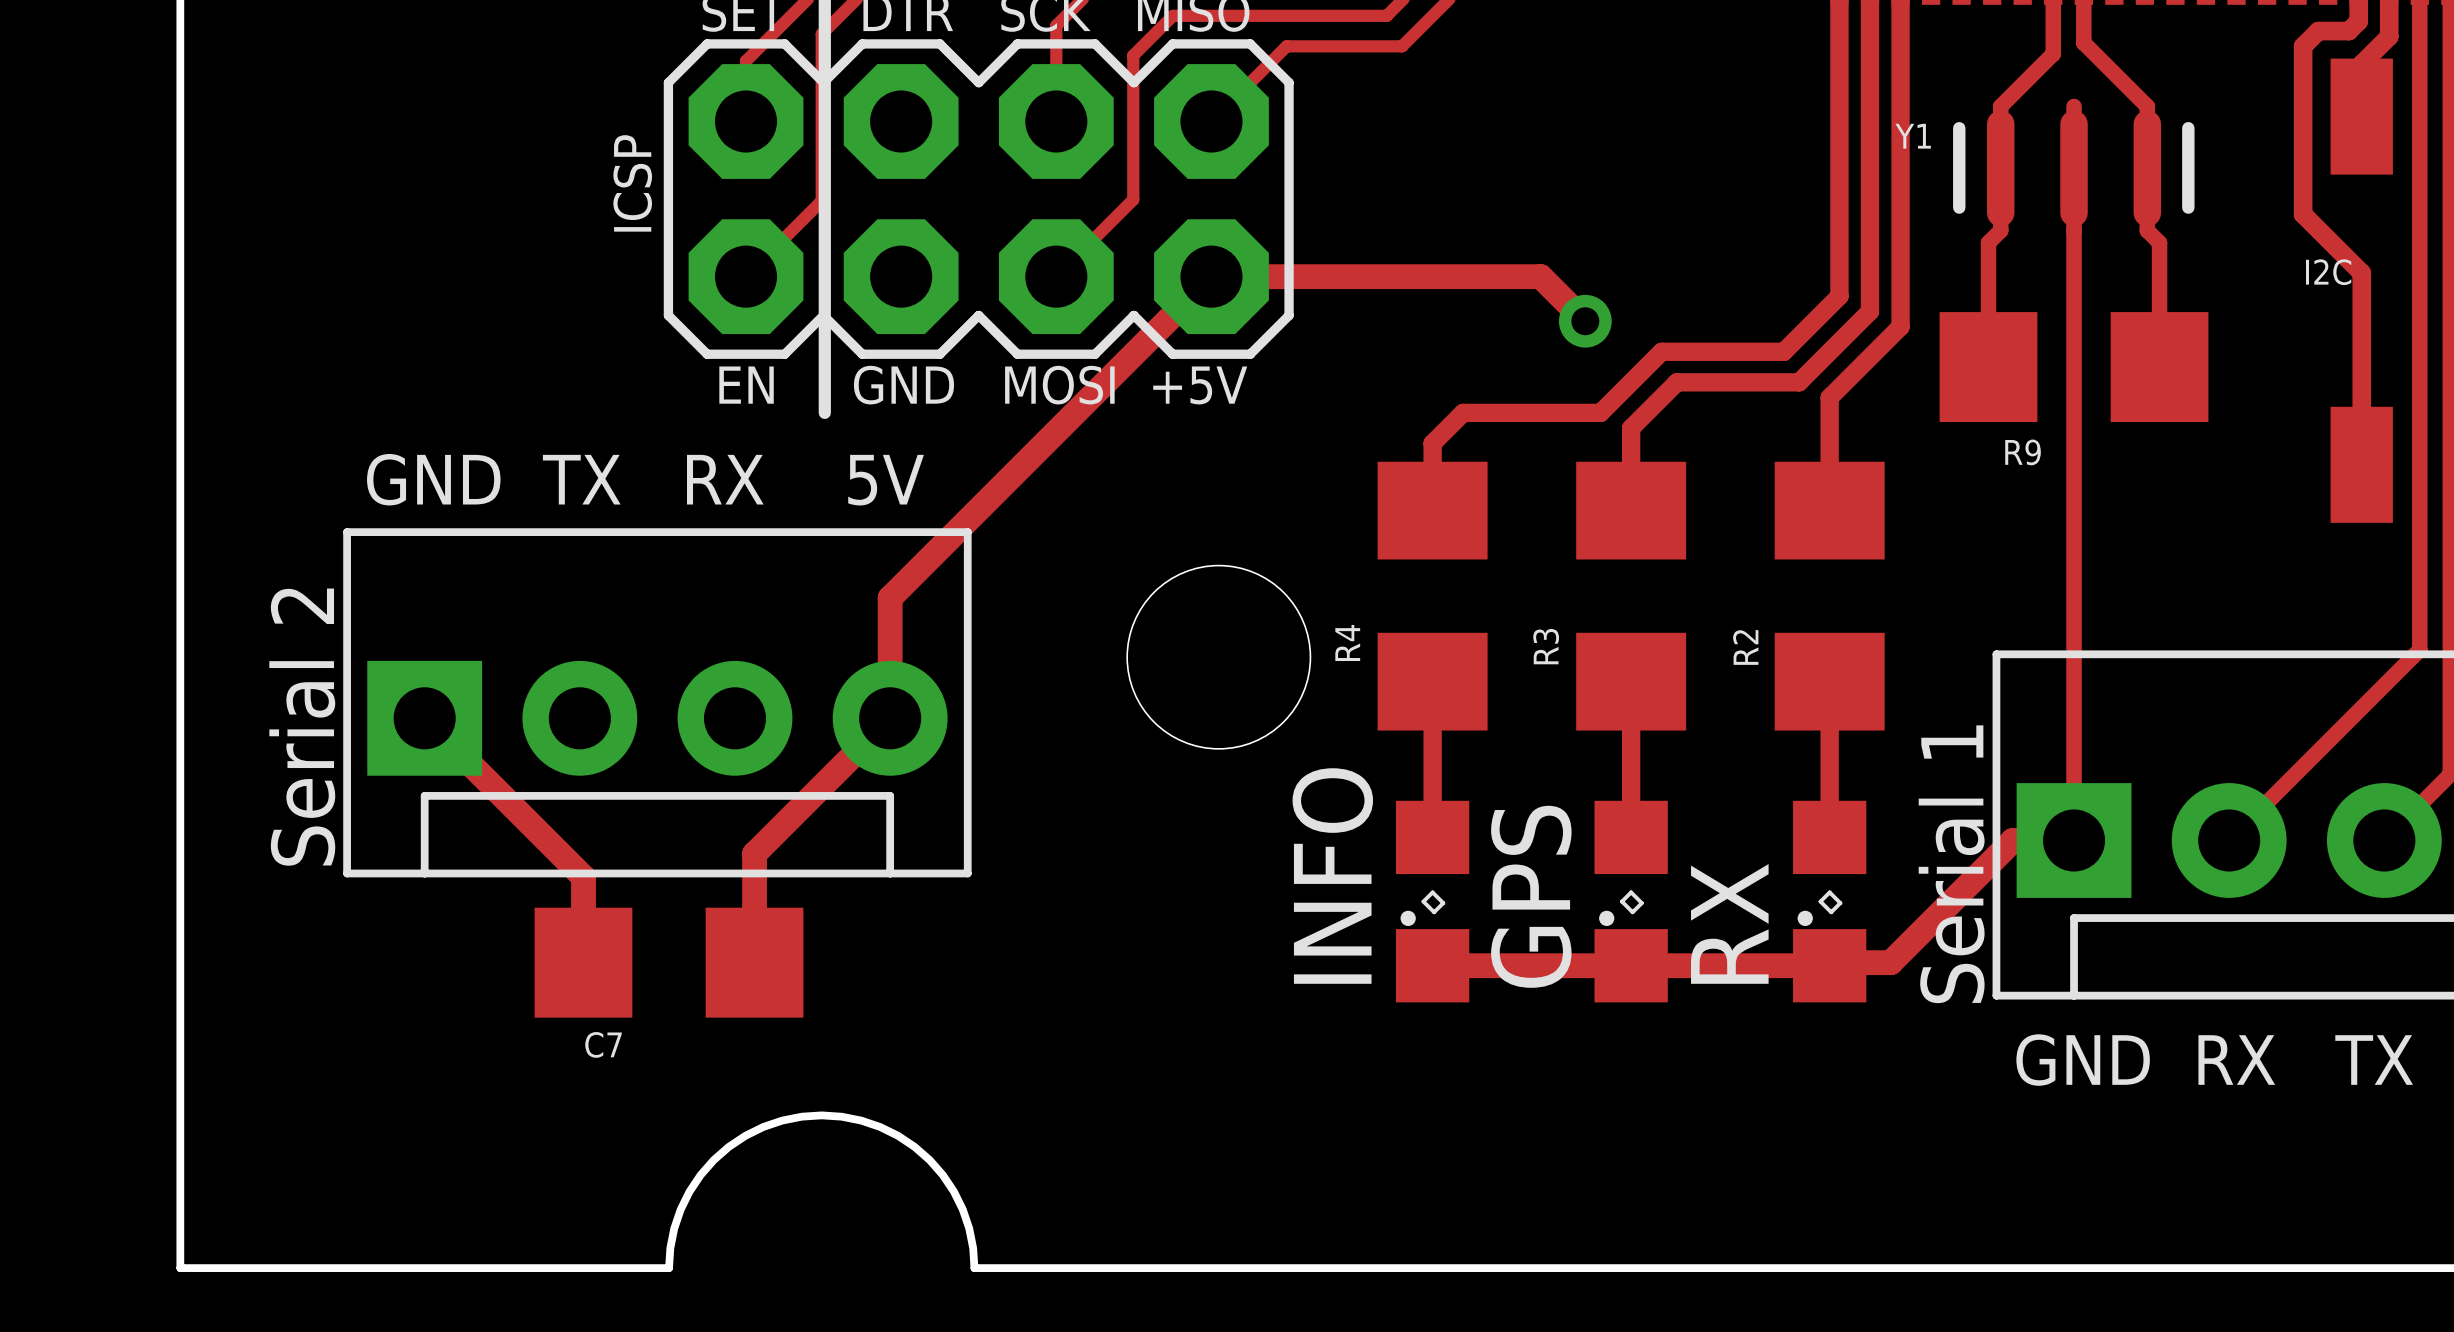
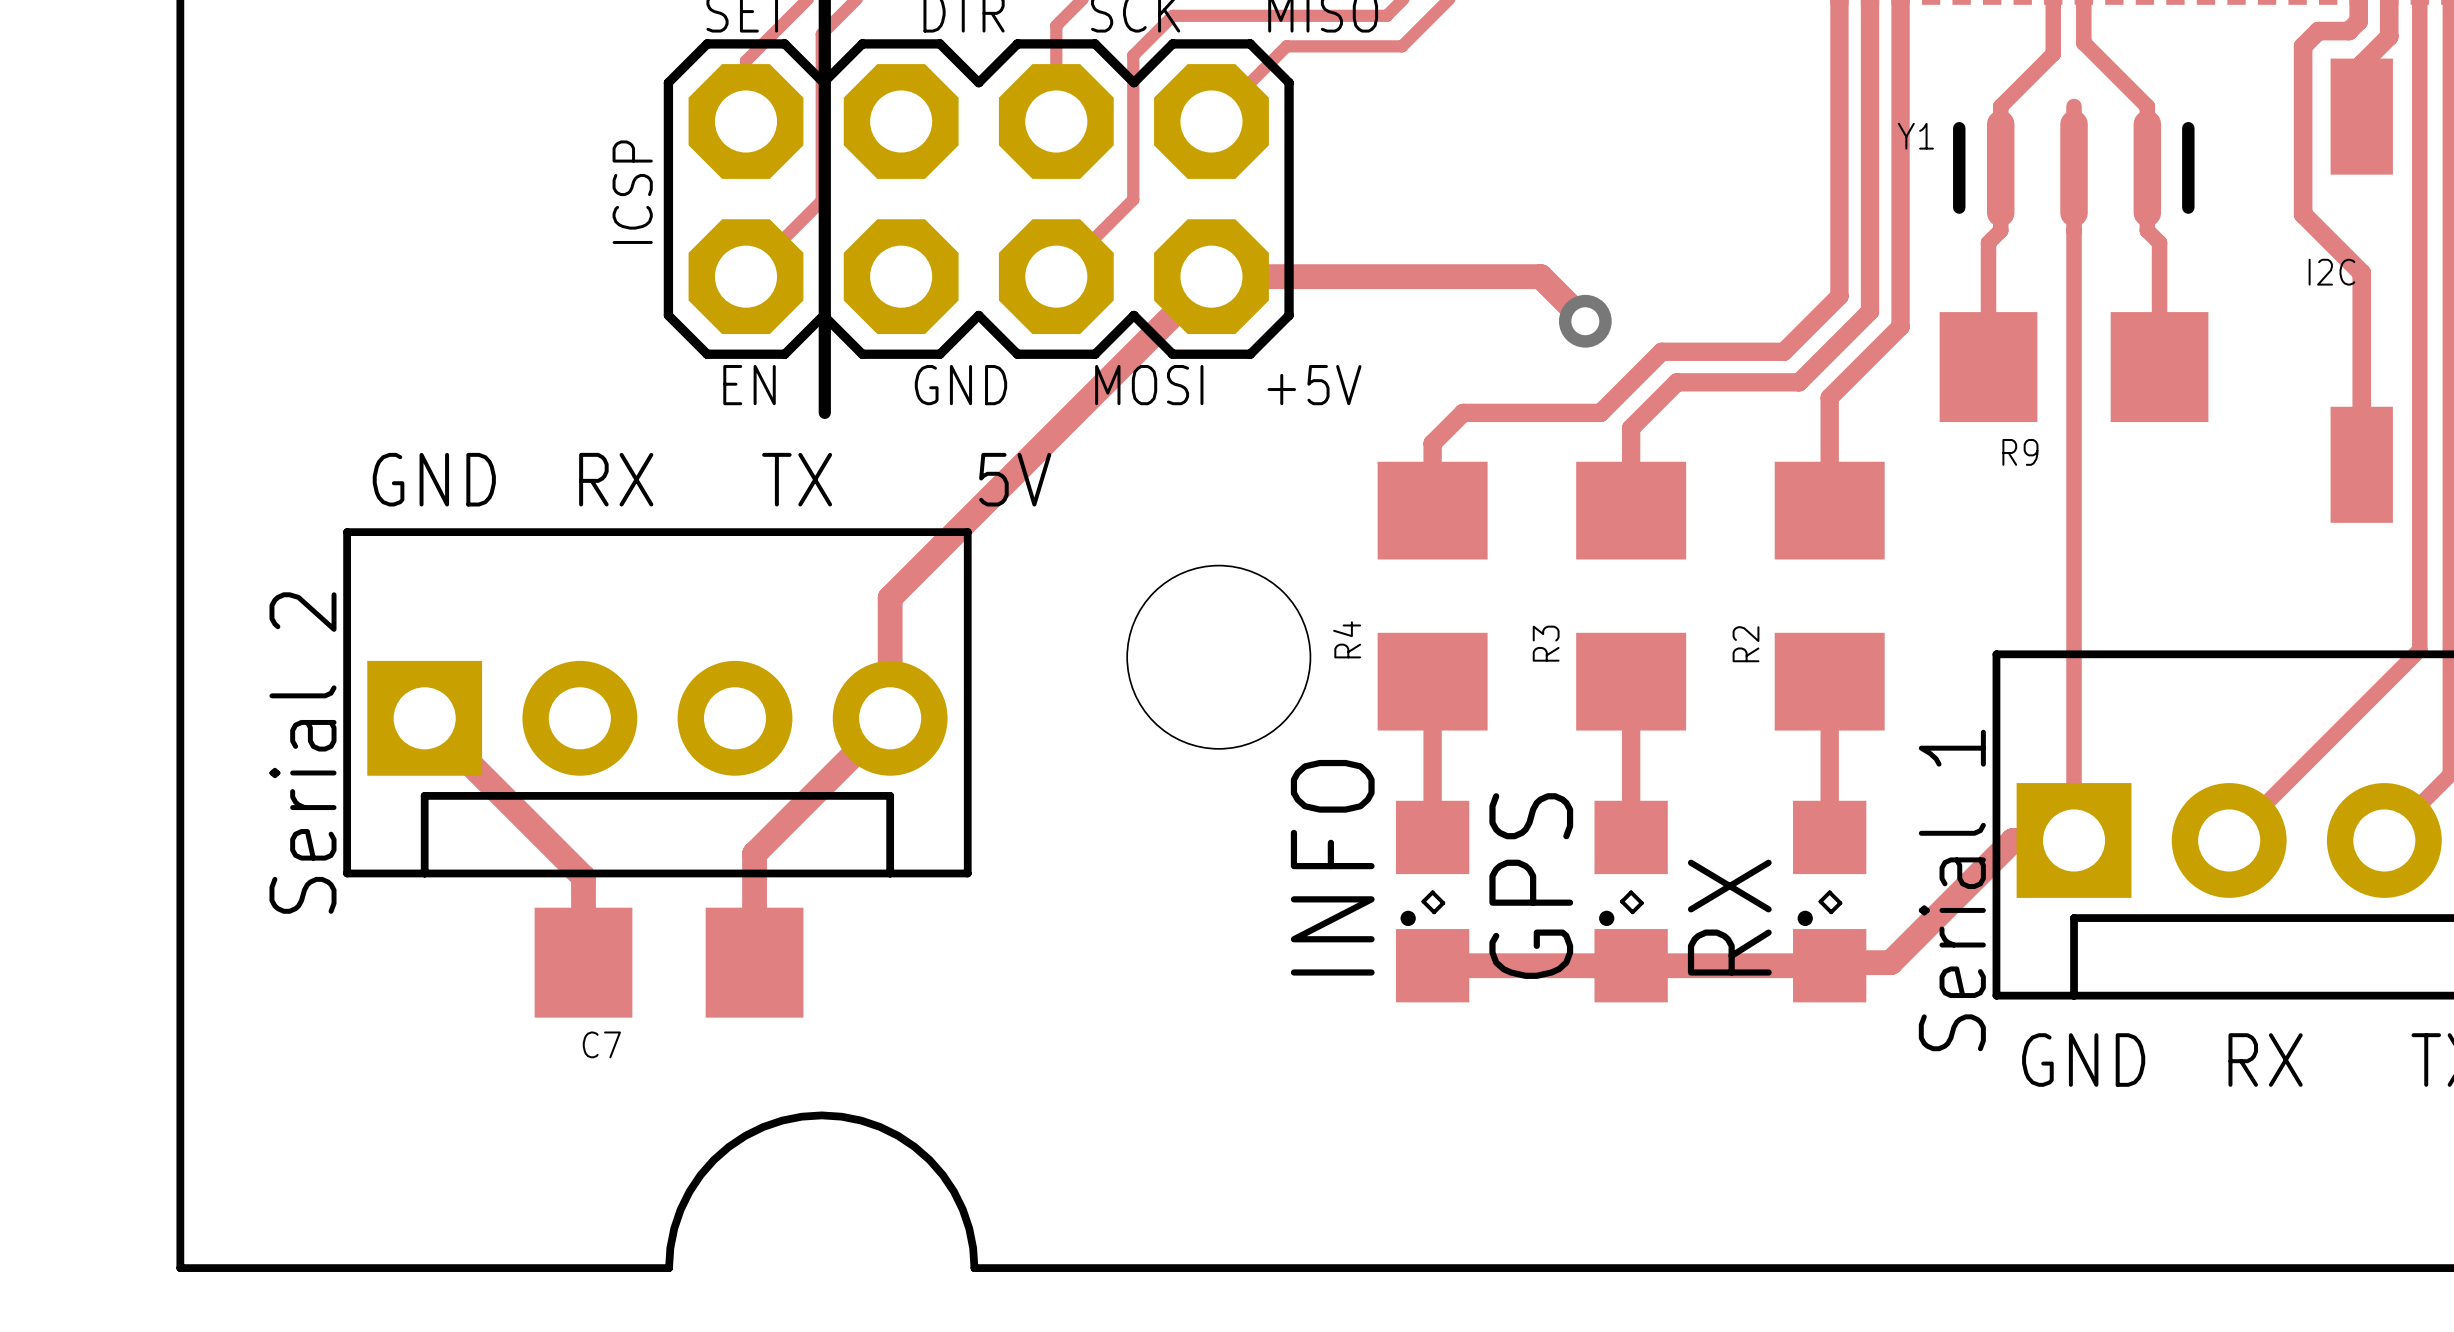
text: GND TX RX 5V (645, 479) -> GND RX TX 5V (711, 479)

